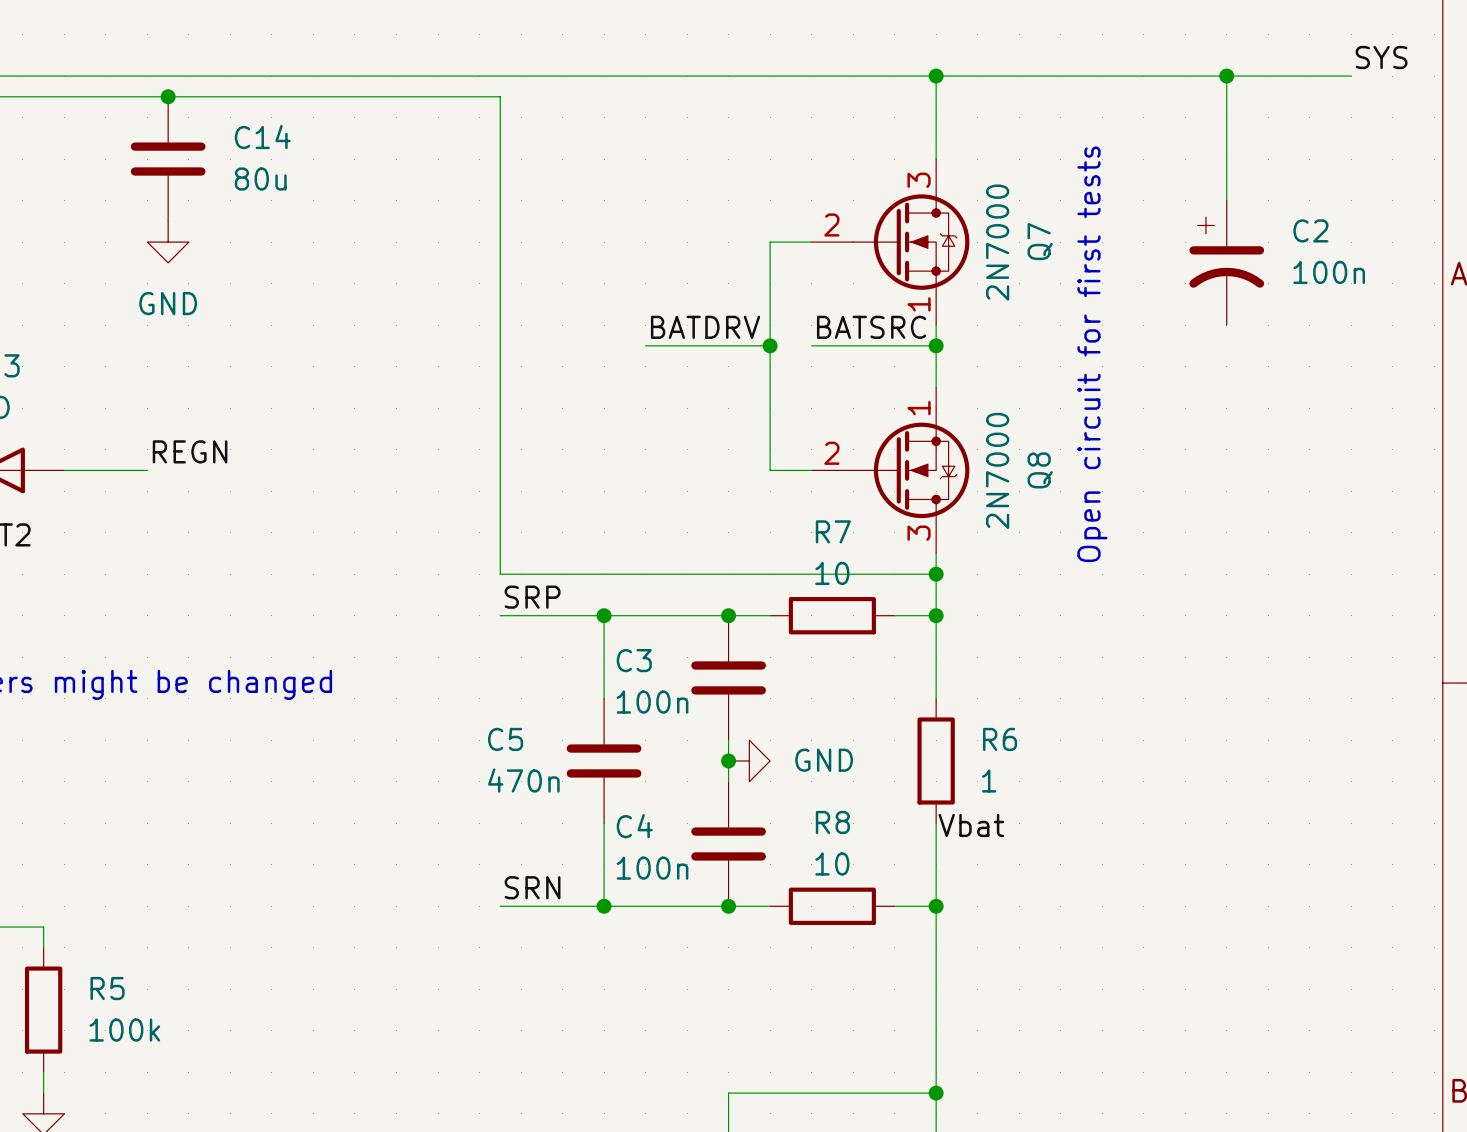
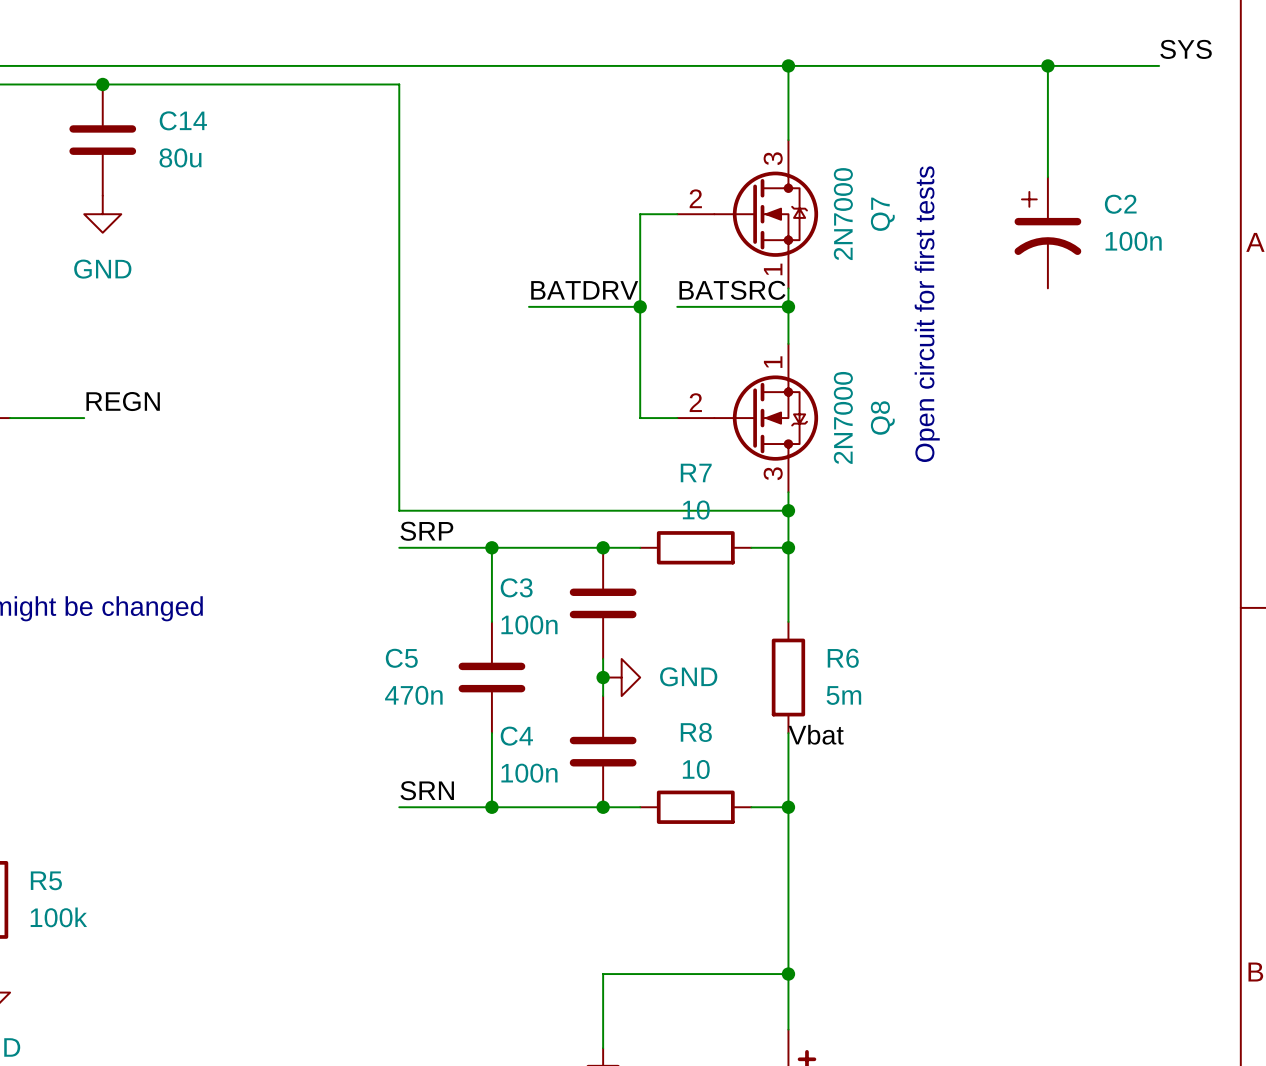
R6 value: 1 (989, 780) -> 5m (843, 695)

